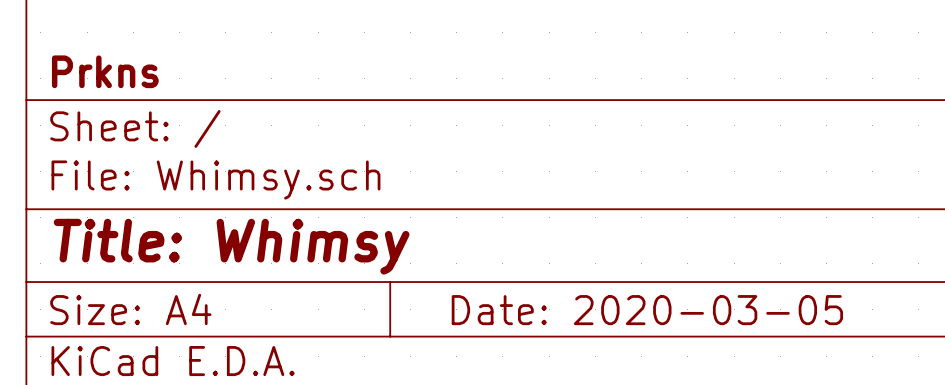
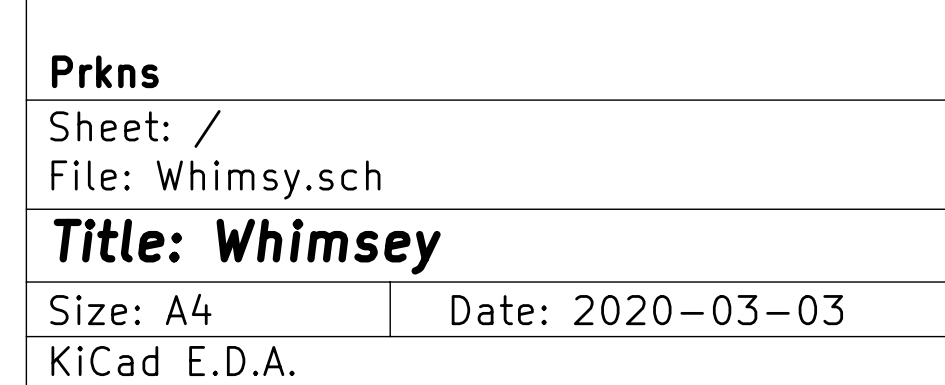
title block: Title: Whimsy (231, 246) -> Title: Whimsey (247, 246)
title block: Date: 2020-03-05 (647, 310) -> Date: 2020-03-03 (647, 310)

